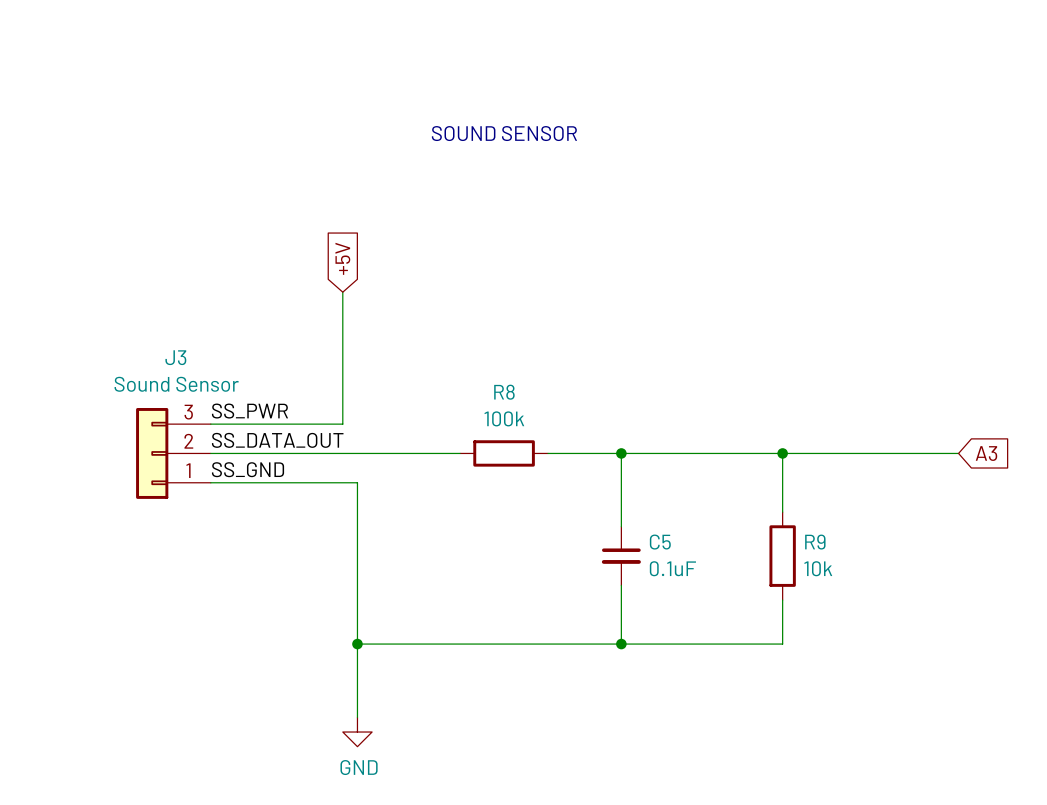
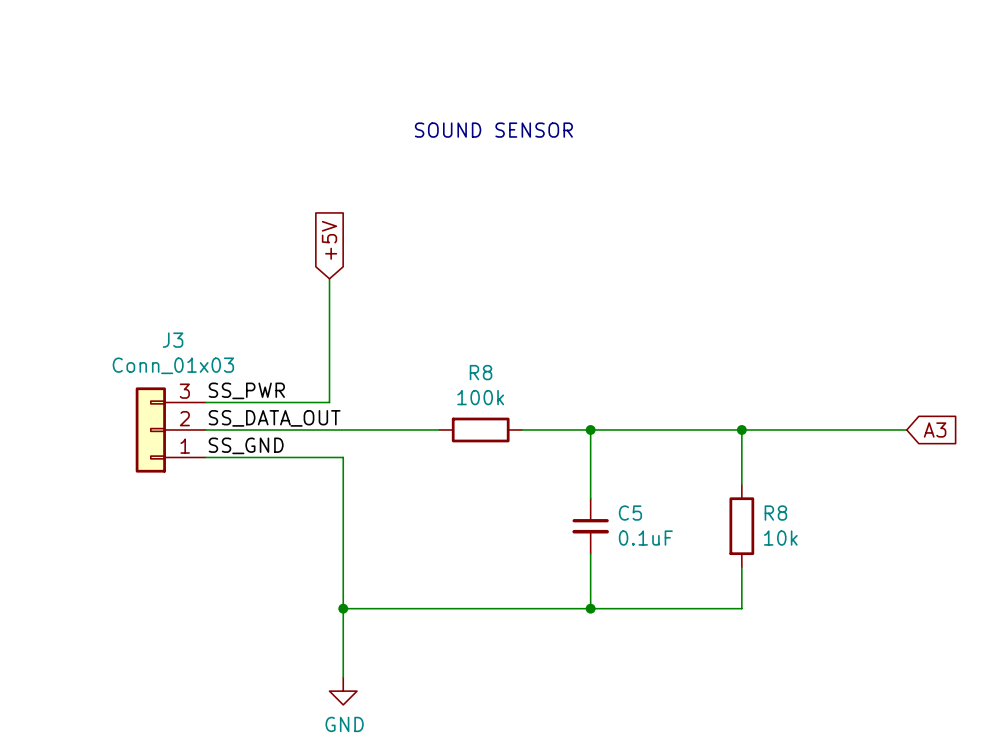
J3 value: Sound Sensor (176, 384) -> Conn_01x03 (173, 365)
R9 name: R9 (815, 542) -> R8 (775, 513)

